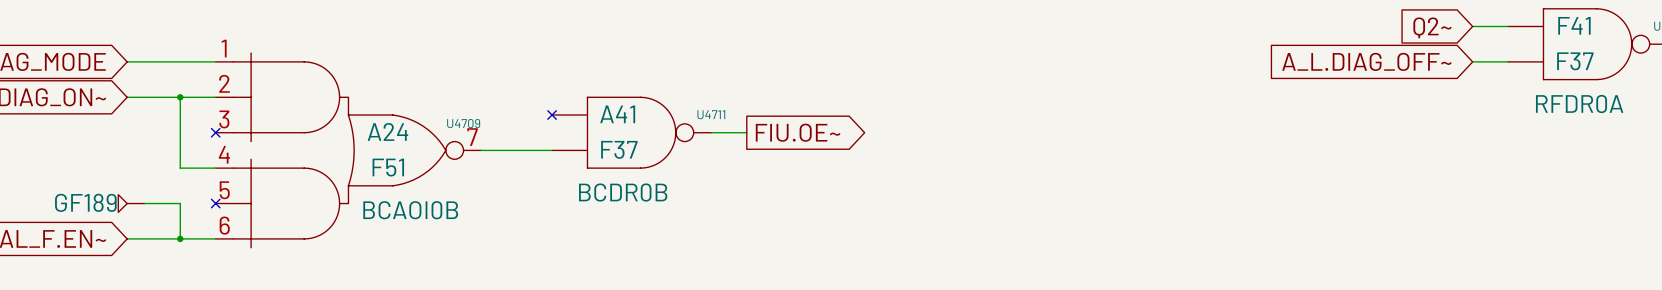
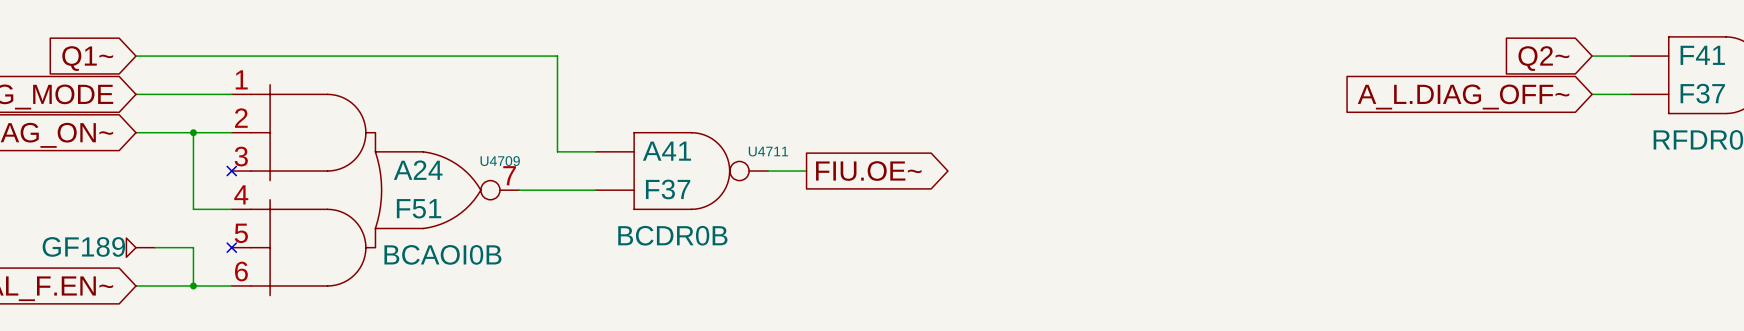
wire: none -> (135, 56) (557, 56) (557, 151) (595, 151)
global label: none -> Q1~ (87, 58)
no-connect mark: (552, 115) -> none

